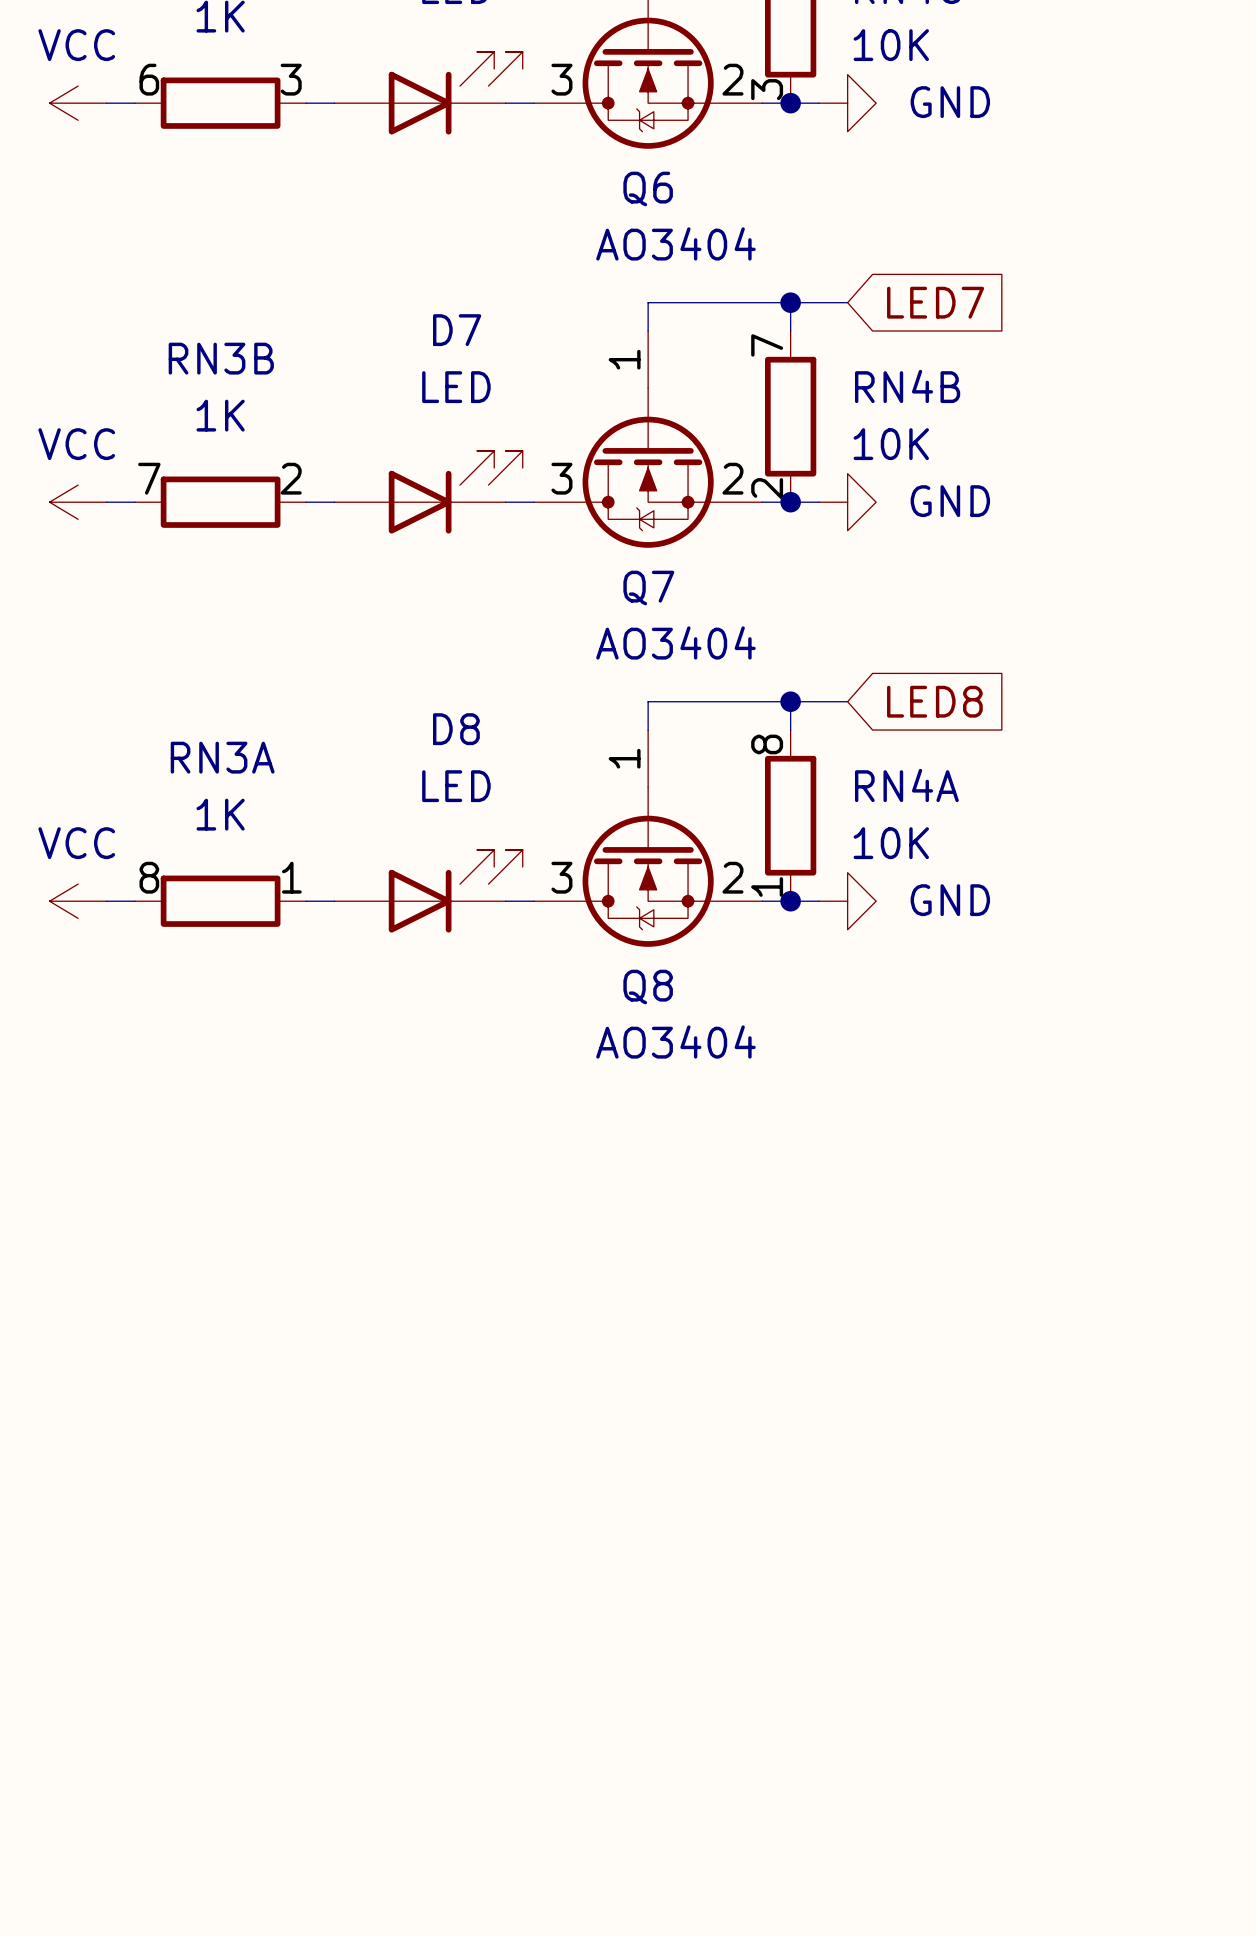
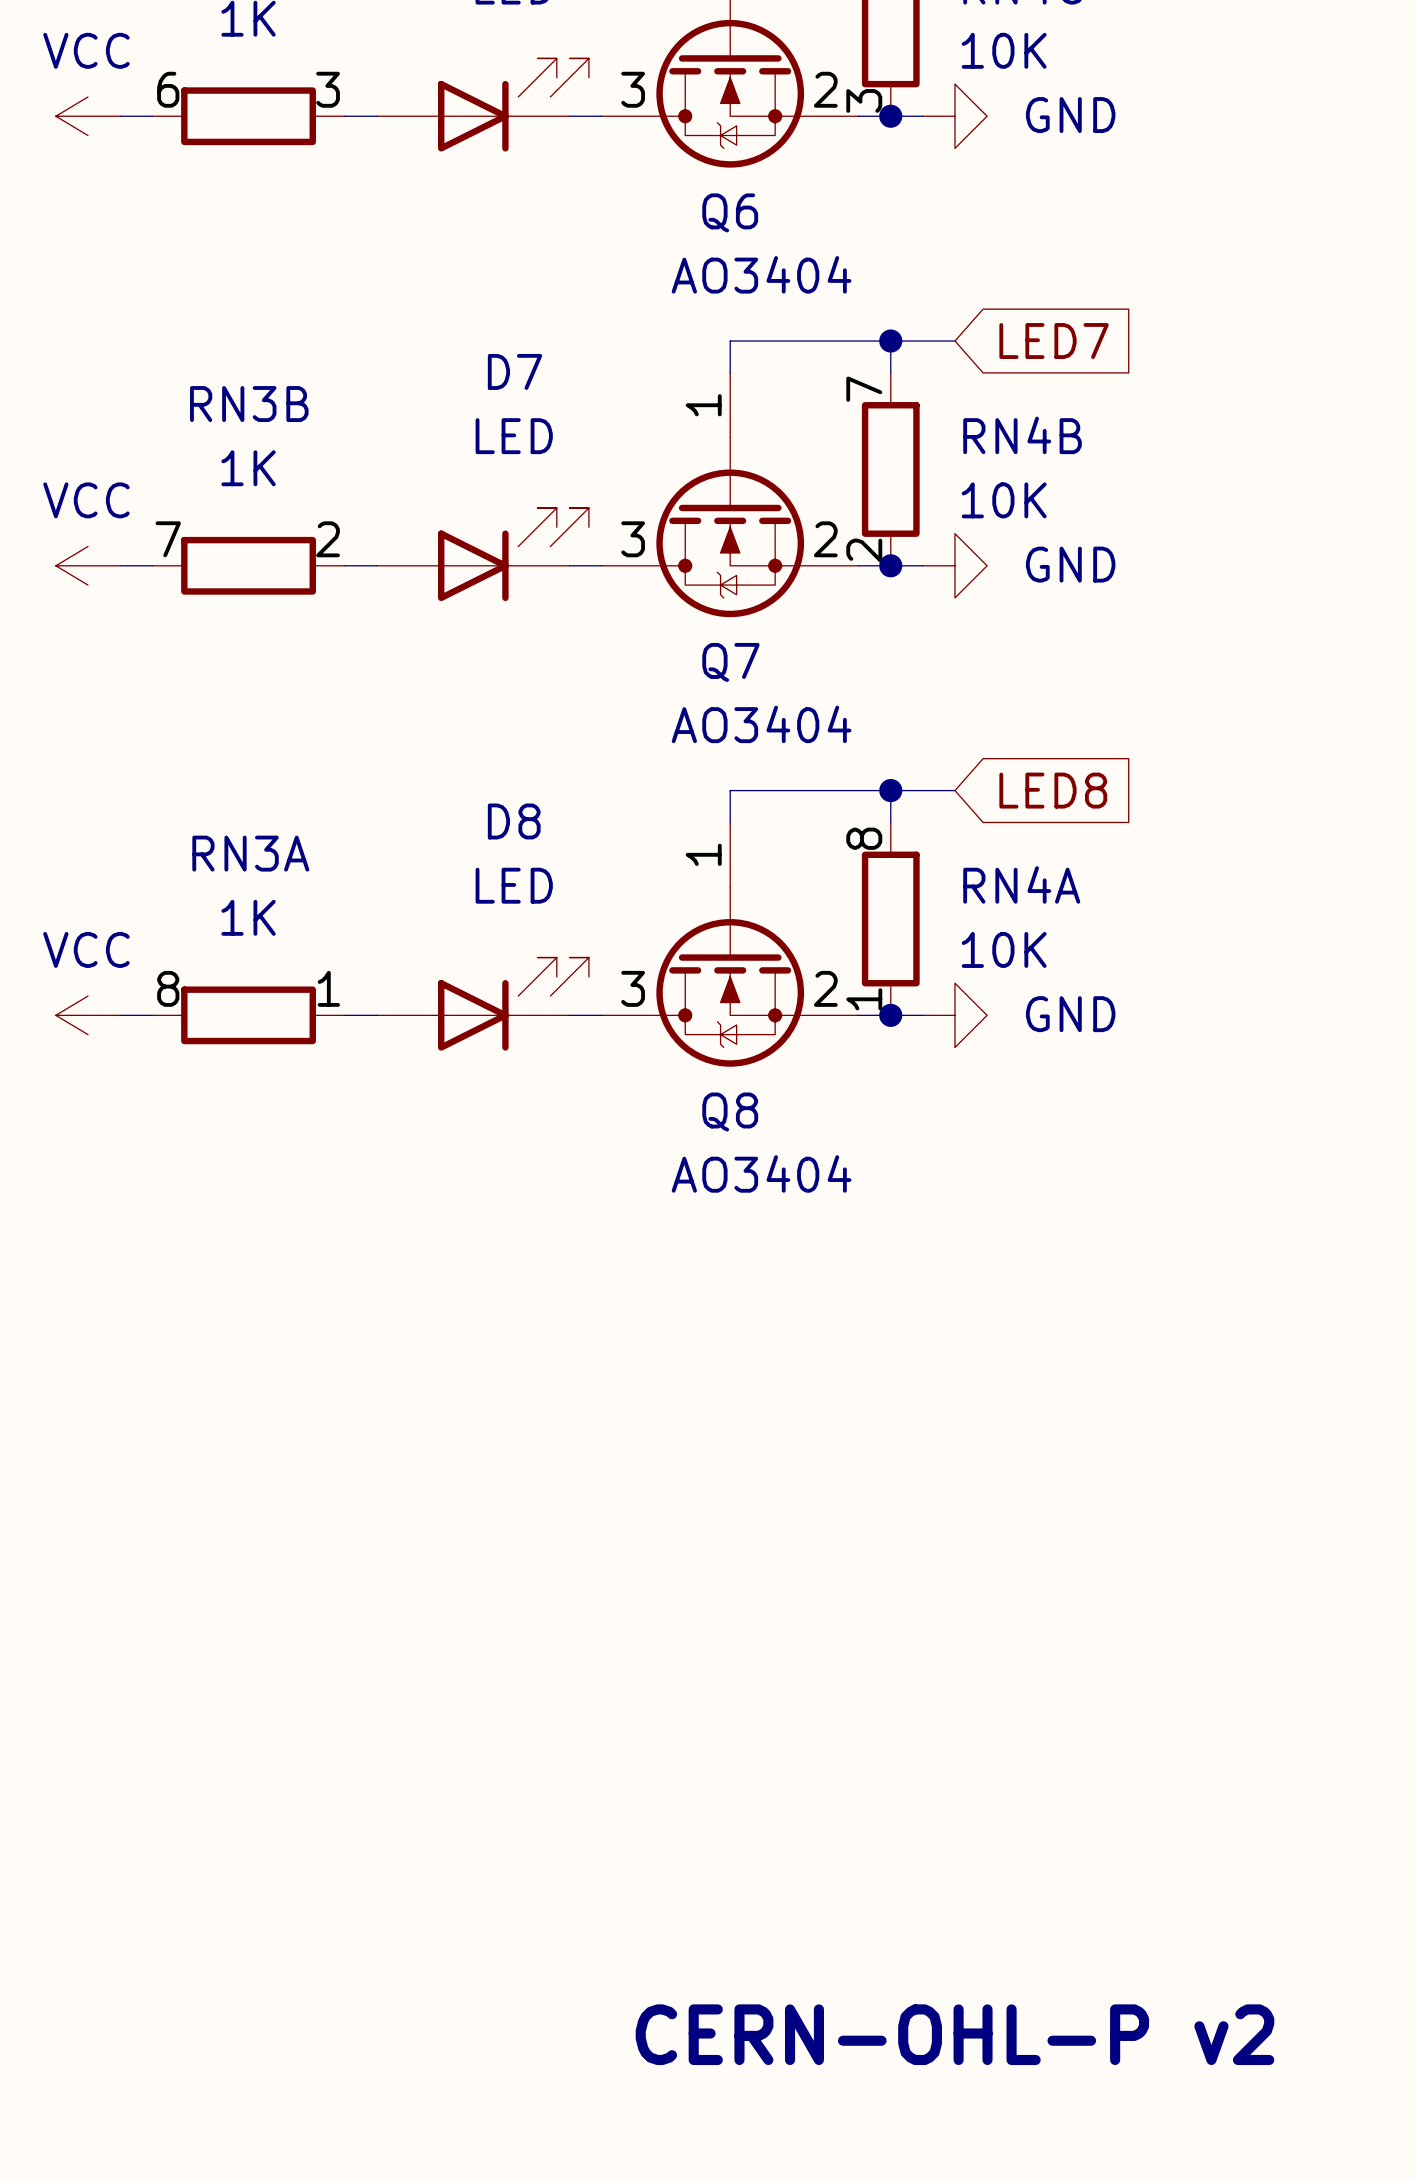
text: none -> CERN-OHL-P v2 (954, 2034)

